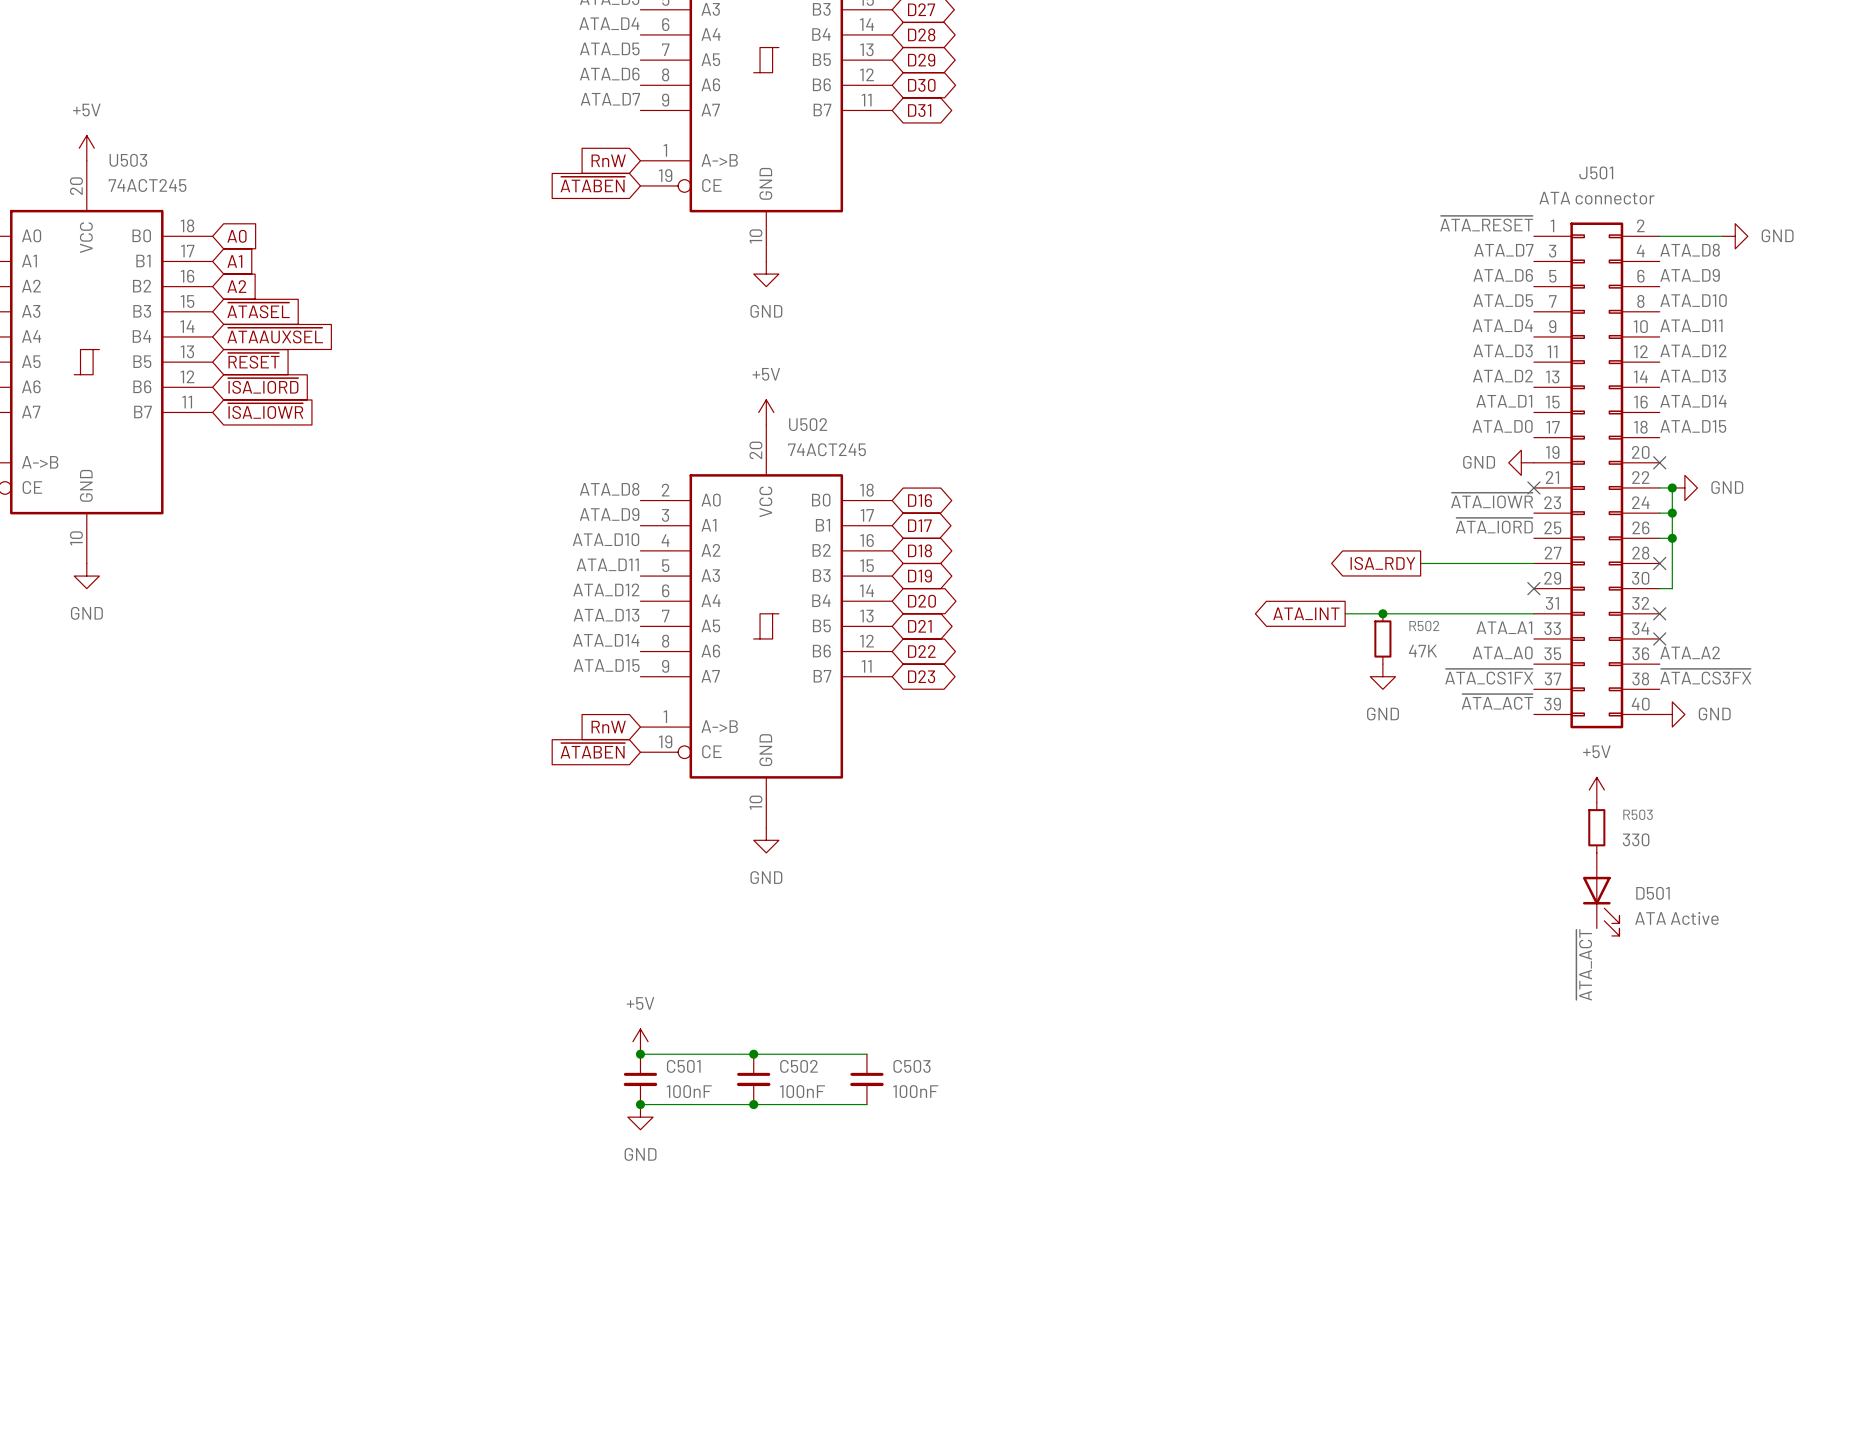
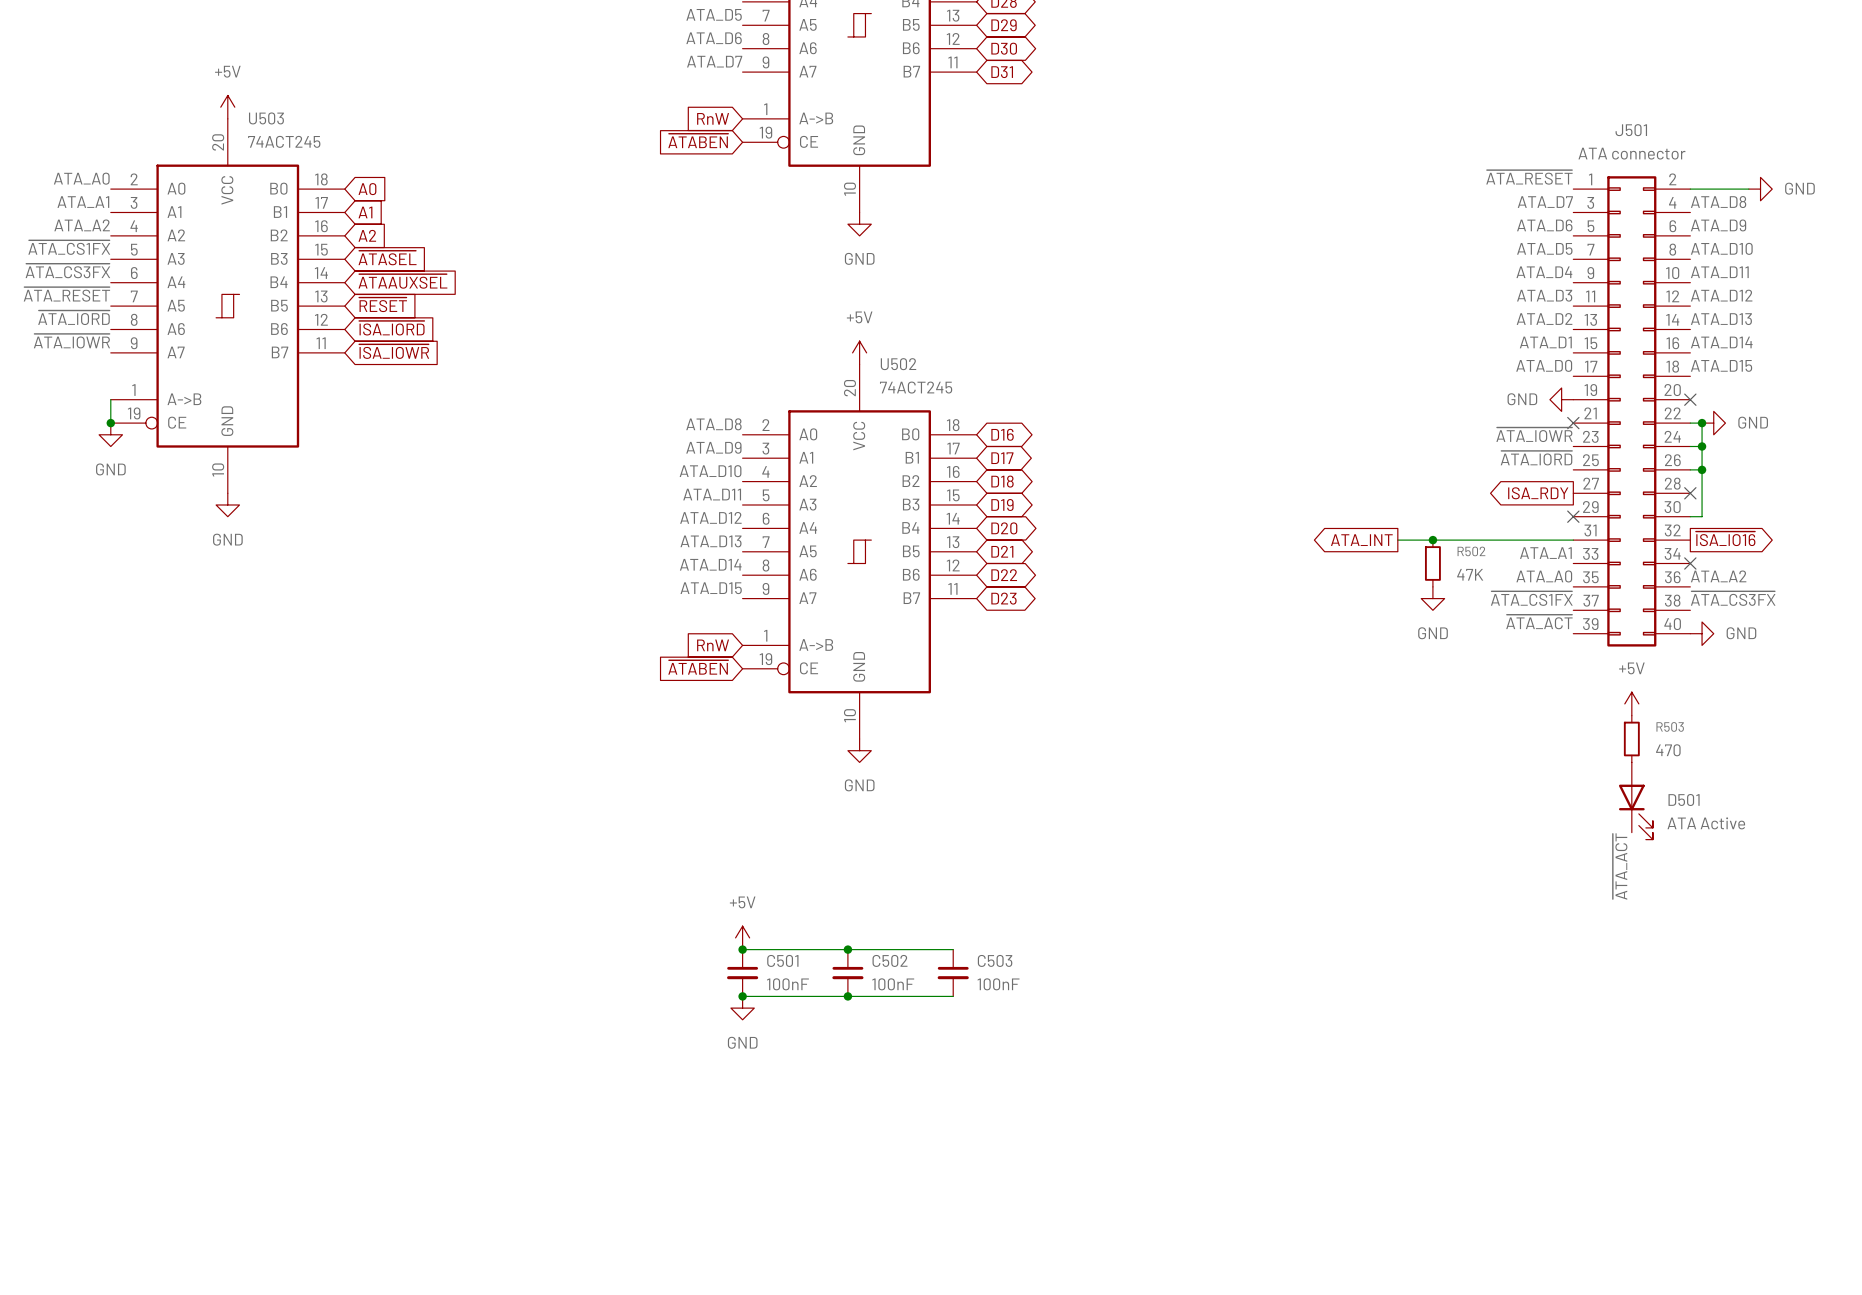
global label position: ISA_RDY (1382, 563) -> ISA_RDY (1538, 493)
wire: (1420, 563) (1533, 563) -> none
global label: none -> ~{ISA_IO16} (1725, 538)
no-connect mark: (1659, 613) -> none
R503 value: 330 (1636, 839) -> 470 (1668, 750)

